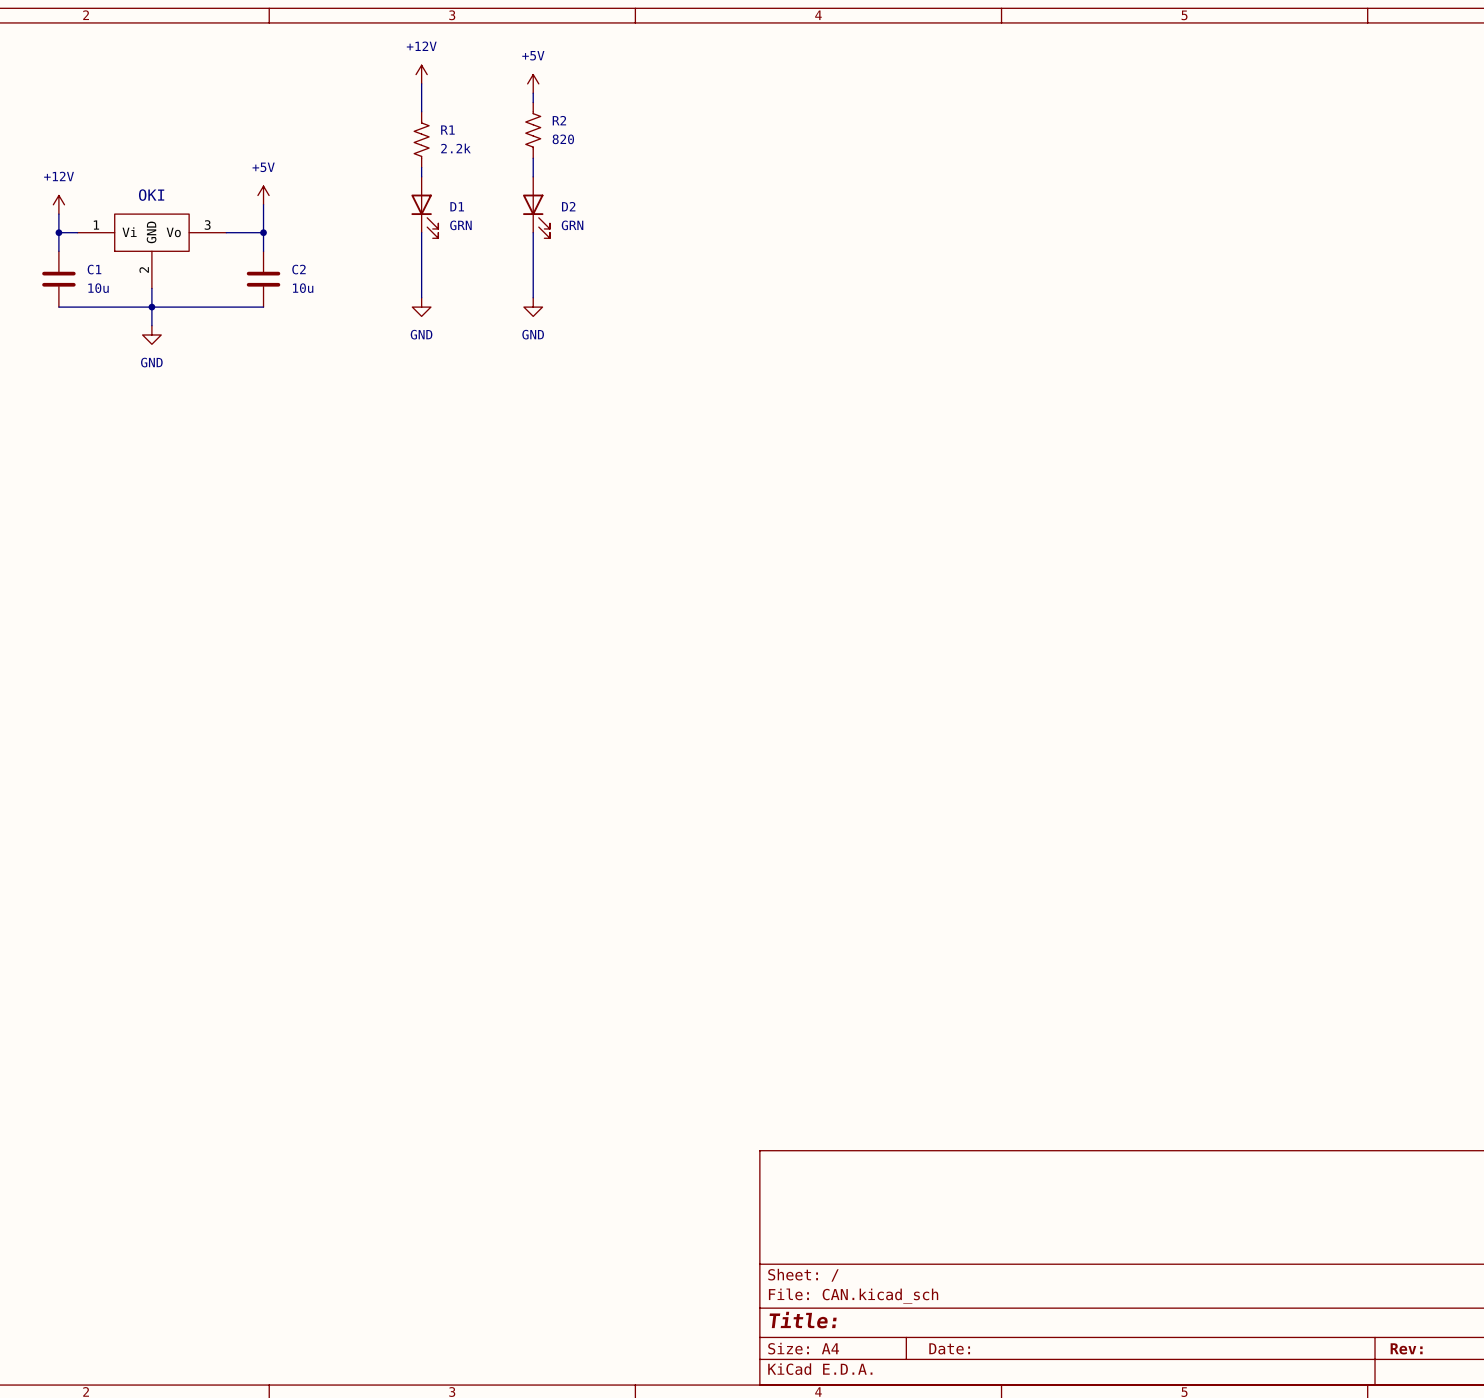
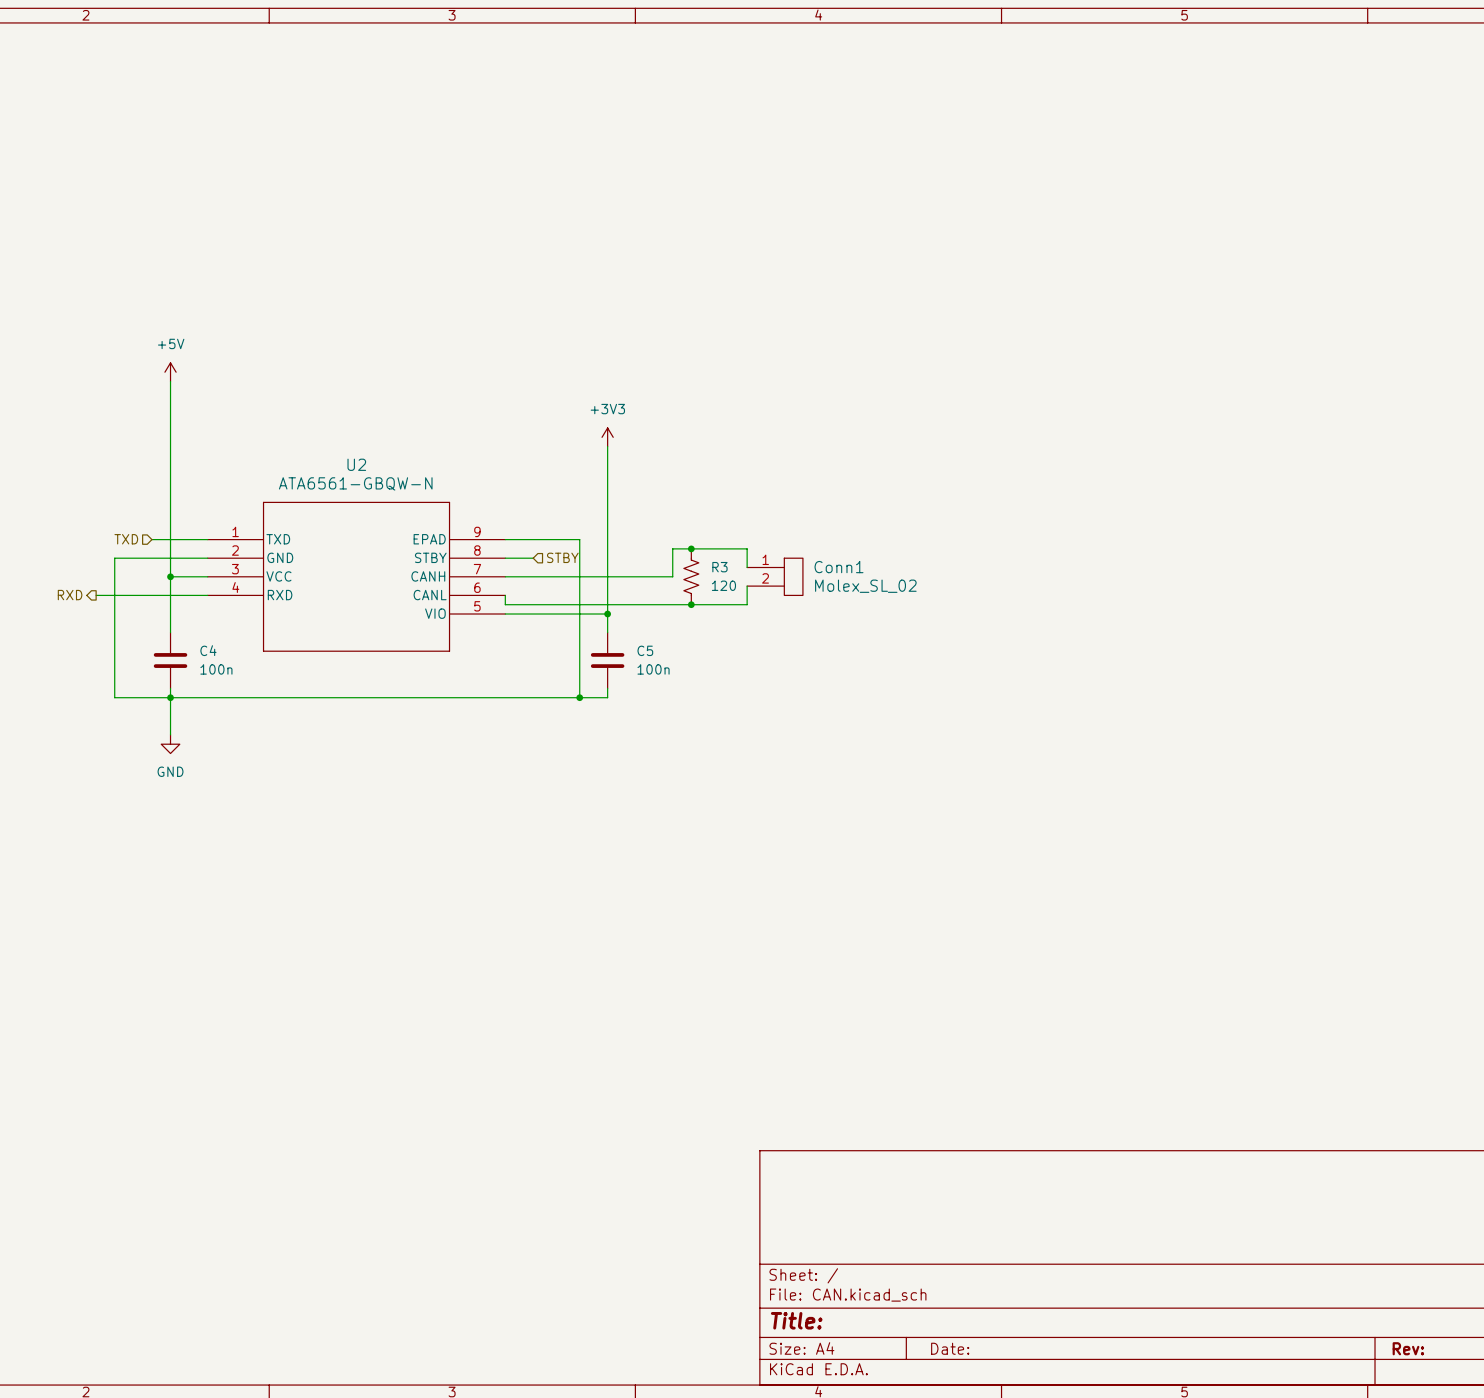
power symbol: +12V (421, 74) -> none
wire: (421, 83) (421, 111) -> none
power symbol: +5V (533, 83) -> none
wire: (533, 93) (533, 102) -> none
R2: 820 (533, 130) -> none
R1: 2.2k (421, 139) -> none
wire: (533, 158) (533, 176) -> none
wire: (421, 167) (421, 176) -> none
power symbol: +5V (263, 195) -> none
power symbol: +12V (58, 204) -> none
wire: (263, 204) (263, 251) -> none
D1: GRN (424, 207) -> none
D2: GRN (536, 207) -> none
wire: (58, 214) (58, 251) -> none
wire: (58, 232) (77, 232) -> none
junction: (58, 232) -> none
wire: (226, 232) (263, 232) -> none
junction: (263, 232) -> none
wire: (421, 232) (421, 297) -> none
wire: (533, 232) (533, 297) -> none
part: OKI (151, 251) -> none
C1: 10u (58, 279) -> none
C2: 10u (263, 279) -> none
wire: (151, 288) (151, 325) -> none
wire: (58, 307) (263, 307) -> none
junction: (151, 307) -> none
power symbol: GND (421, 307) -> none
power symbol: GND (533, 307) -> none
power symbol: GND (151, 334) -> none
power symbol: none -> +5V (170, 372)
wire: none -> (170, 381) (170, 632)
power symbol: none -> +3V3 (607, 437)
wire: none -> (607, 446) (607, 632)
hierarchical label: none -> TXD (126, 539)
wire: none -> (151, 539) (207, 539)
wire: none -> (505, 539) (579, 539) (579, 697)
junction: none -> (691, 548)
hierarchical label: none -> STBY (562, 557)
wire: none -> (207, 558) (114, 558) (114, 697) (607, 697) (607, 688)
wire: none -> (505, 558) (533, 558)
wire: none -> (747, 567) (747, 548) (672, 548) (672, 576) (505, 576)
wire: none -> (170, 576) (207, 576)
junction: none -> (170, 576)
U2: none -> ATA6561-GBQW-N (356, 576)
R3: none -> 120 (691, 576)
Conn1: none -> Molex_SL_02 (775, 576)
wire: none -> (747, 586) (747, 604) (505, 604) (505, 595)
hierarchical label: none -> RXD (70, 595)
wire: none -> (96, 595) (207, 595)
junction: none -> (691, 604)
wire: none -> (505, 614) (607, 614)
junction: none -> (607, 614)
C4: none -> 100n (170, 660)
C5: none -> 100n (607, 660)
wire: none -> (170, 688) (170, 734)
junction: none -> (170, 697)
junction: none -> (579, 697)
power symbol: none -> GND (170, 744)

